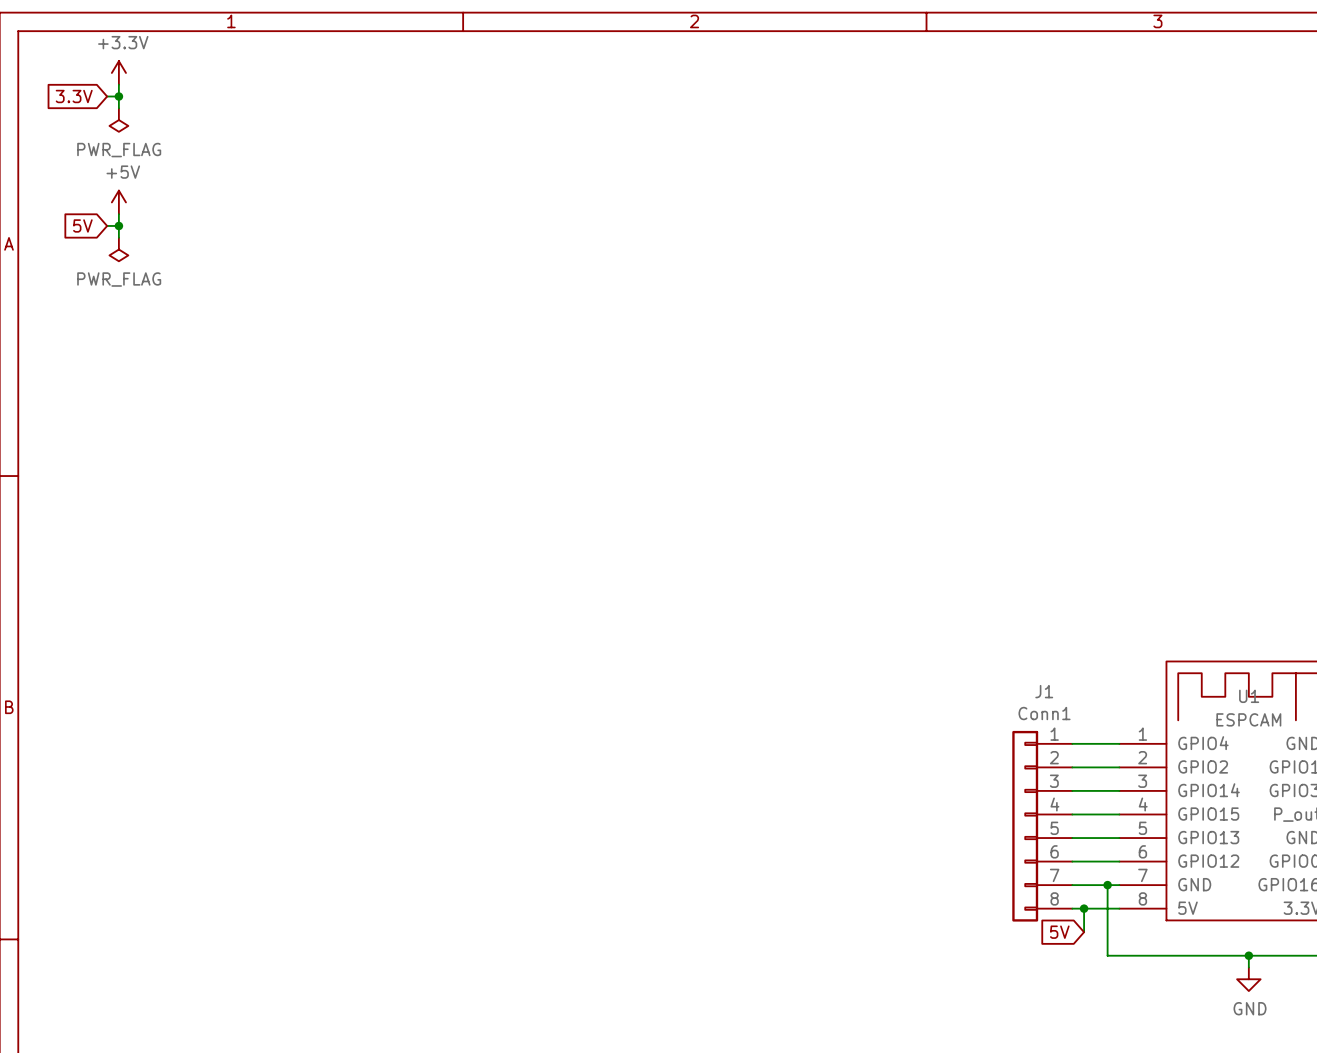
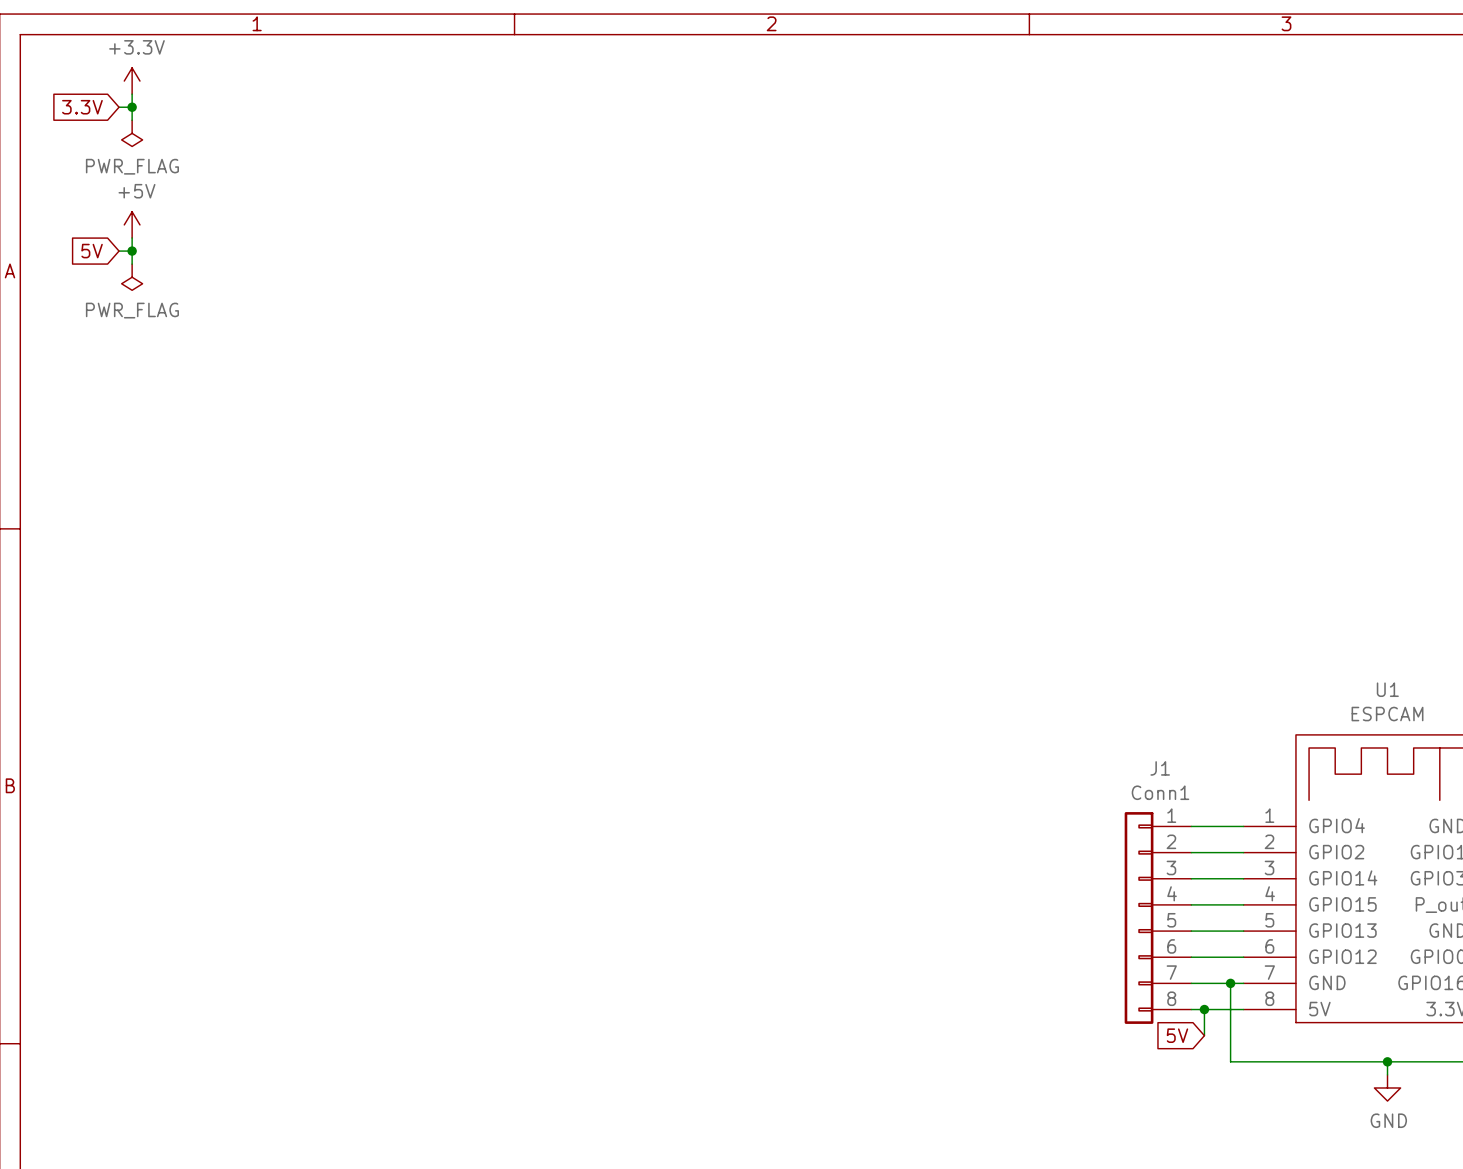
U1 name position: U1 (1249, 696) -> U1 (1387, 689)
U1 value position: ESPCAM (1248, 719) -> ESPCAM (1387, 714)

